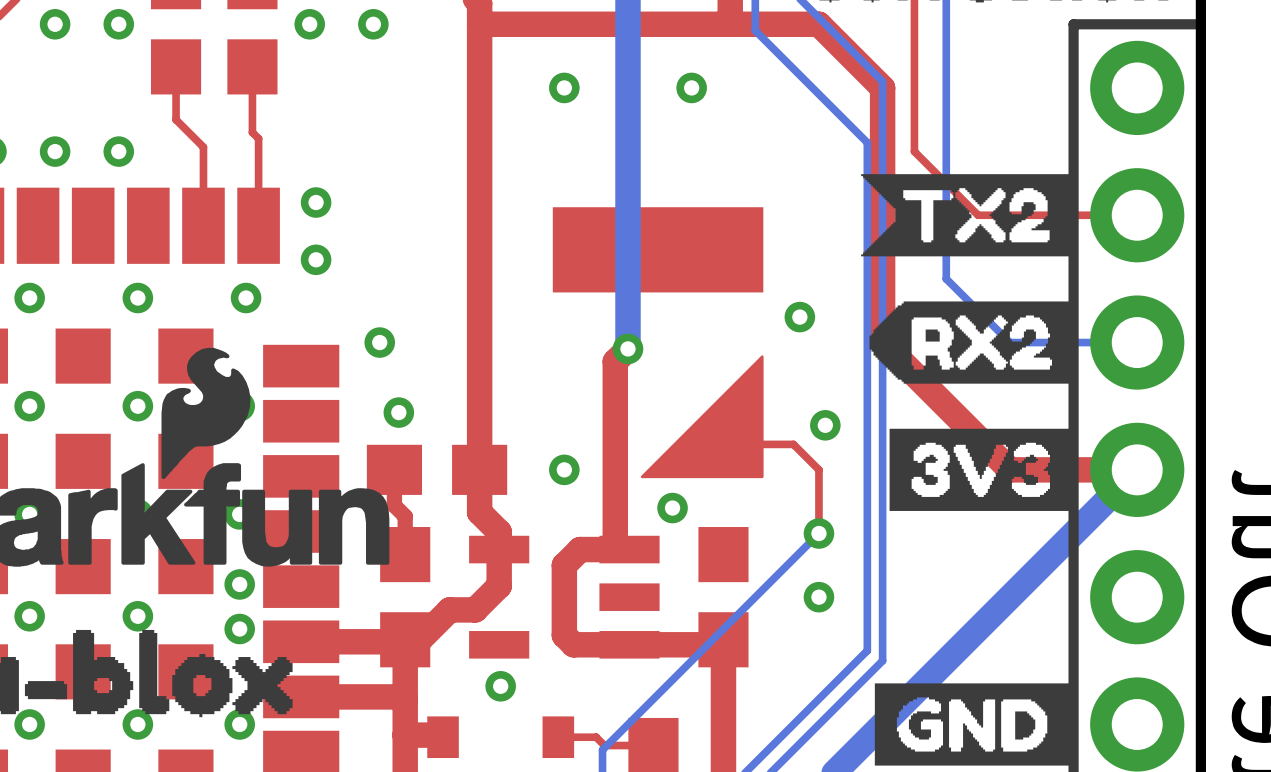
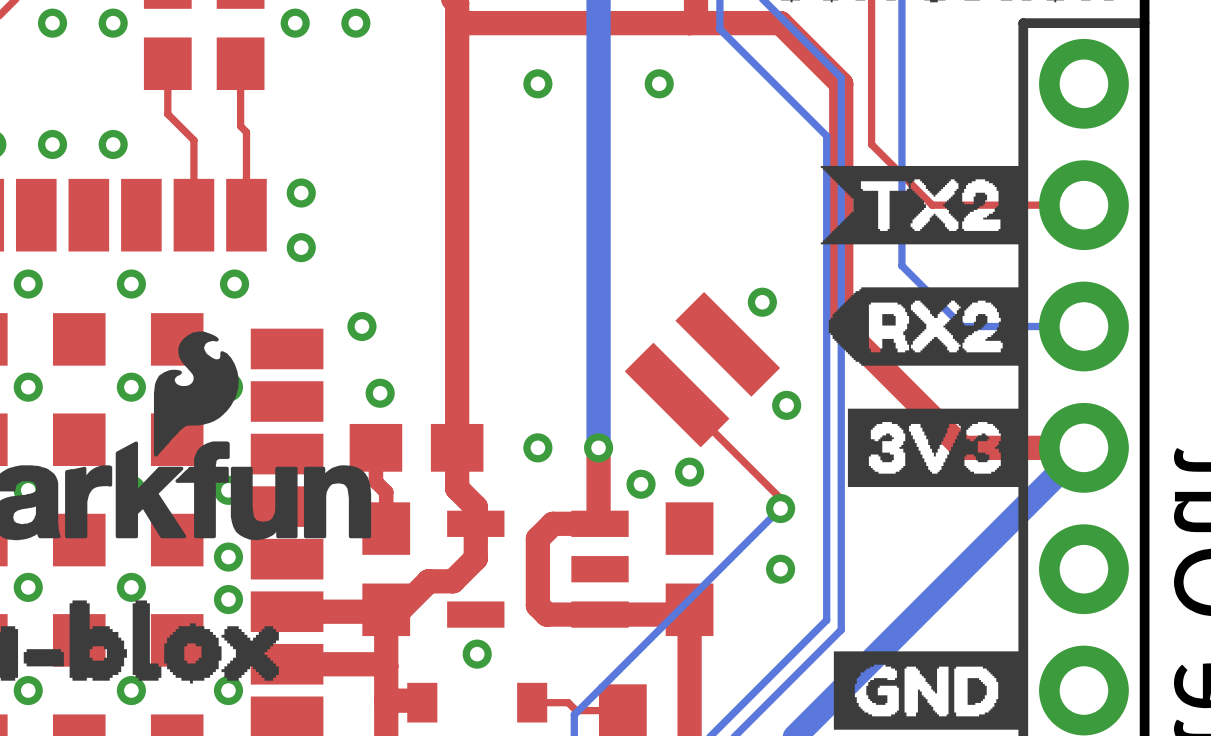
part: (658, 342) -> none
top track: (627, 348) (615, 361) (615, 549) -> none
bottom track: none -> (598, 332) (598, 447)
via: (627, 348) -> none
part: none -> (702, 369)
top track: (729, 444) (793, 444) (818, 469) (818, 523) -> (677, 395) (780, 498)
top track: none -> (598, 447) (598, 523)
via: none -> (598, 447)
via: none -> (689, 472)

